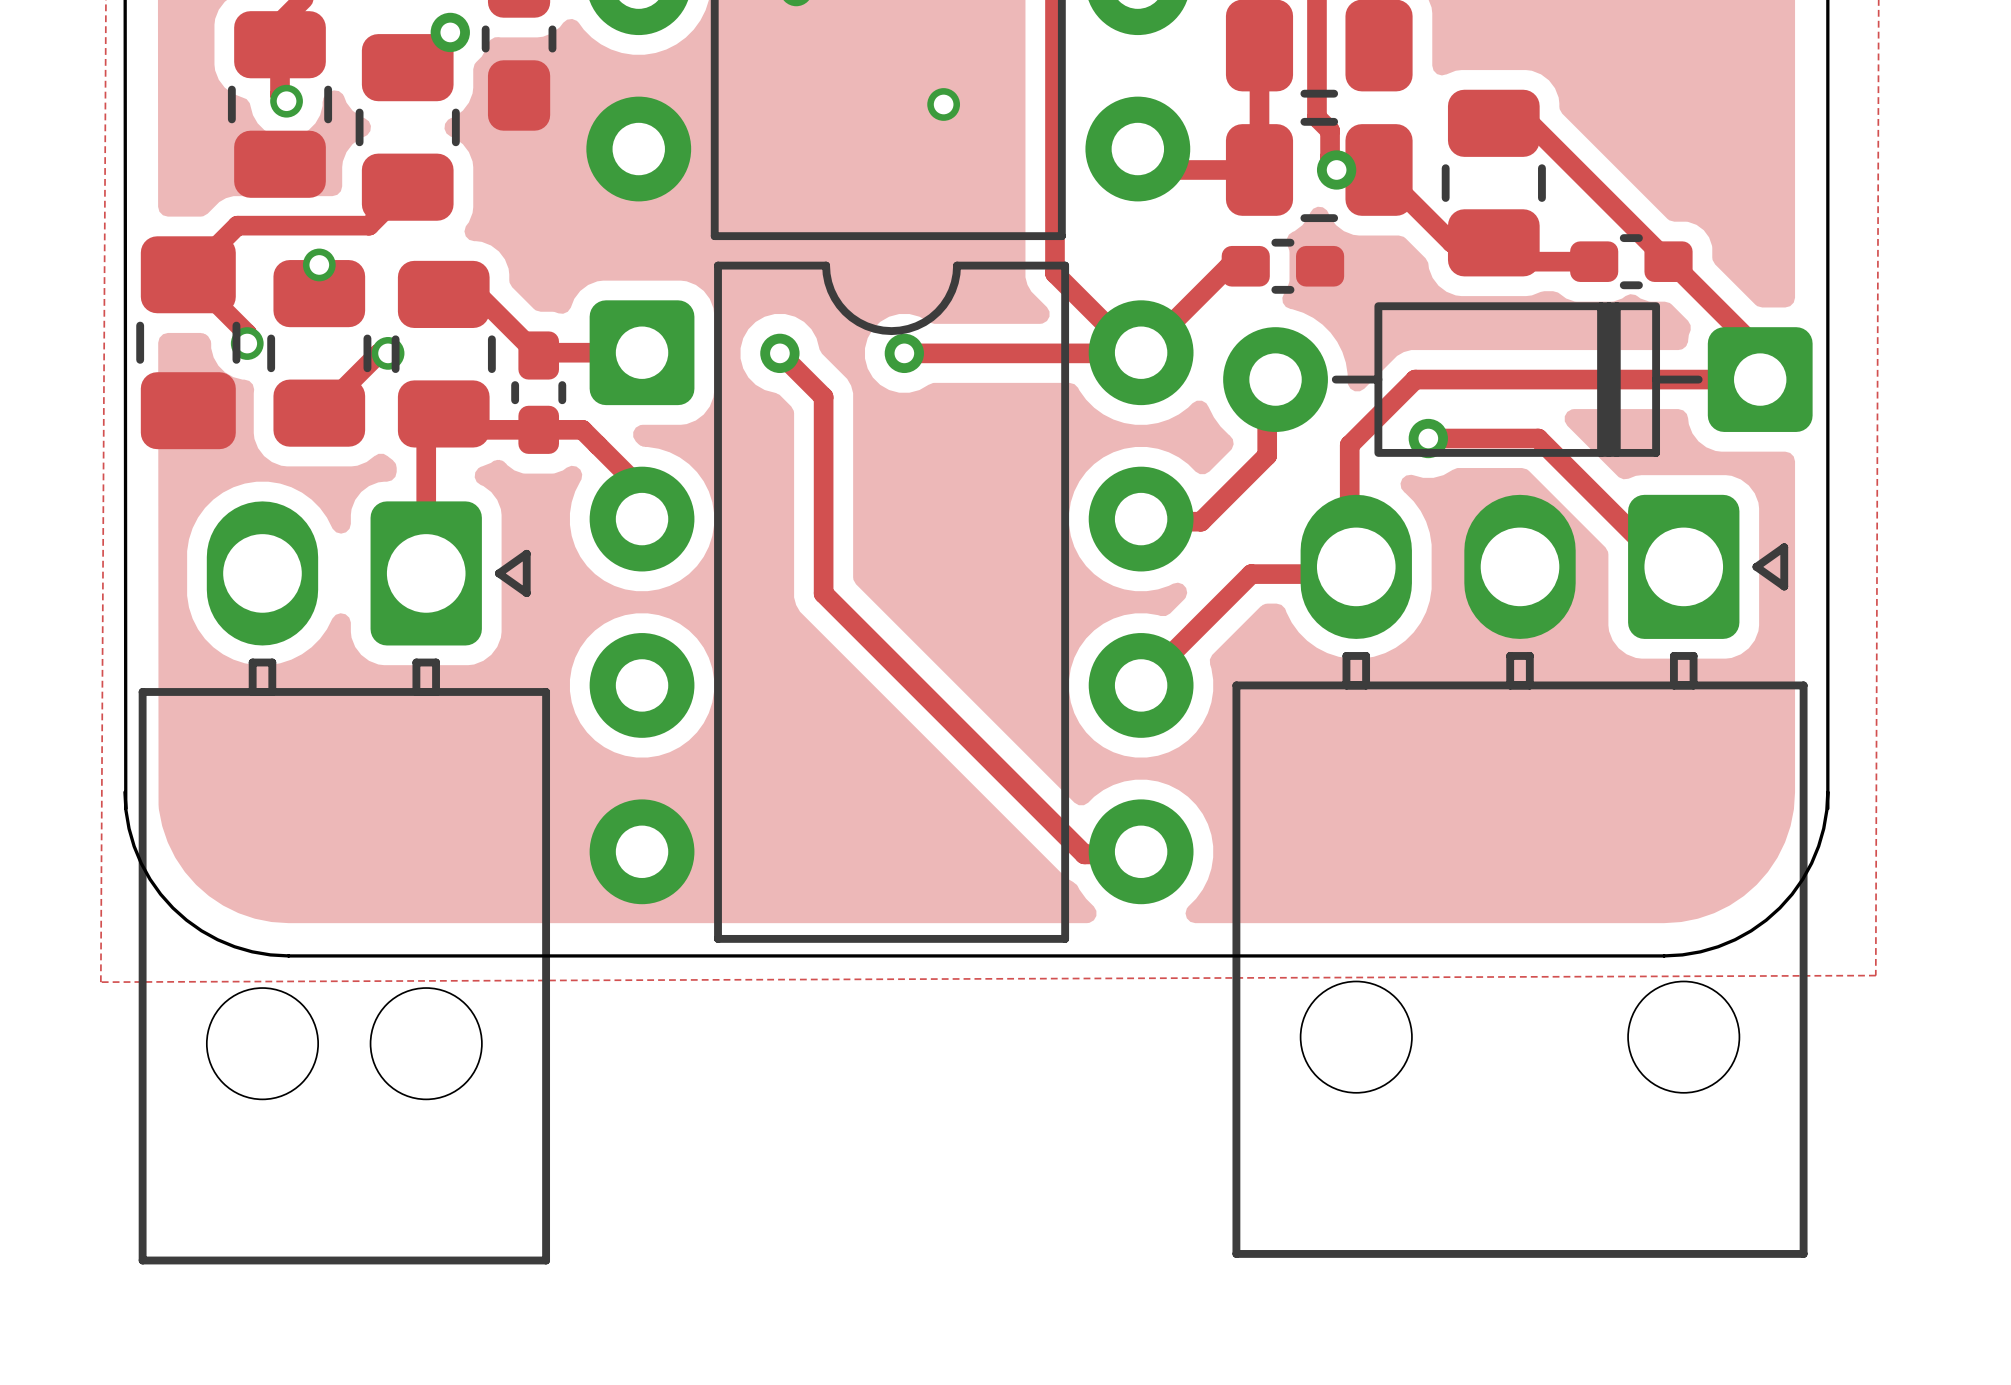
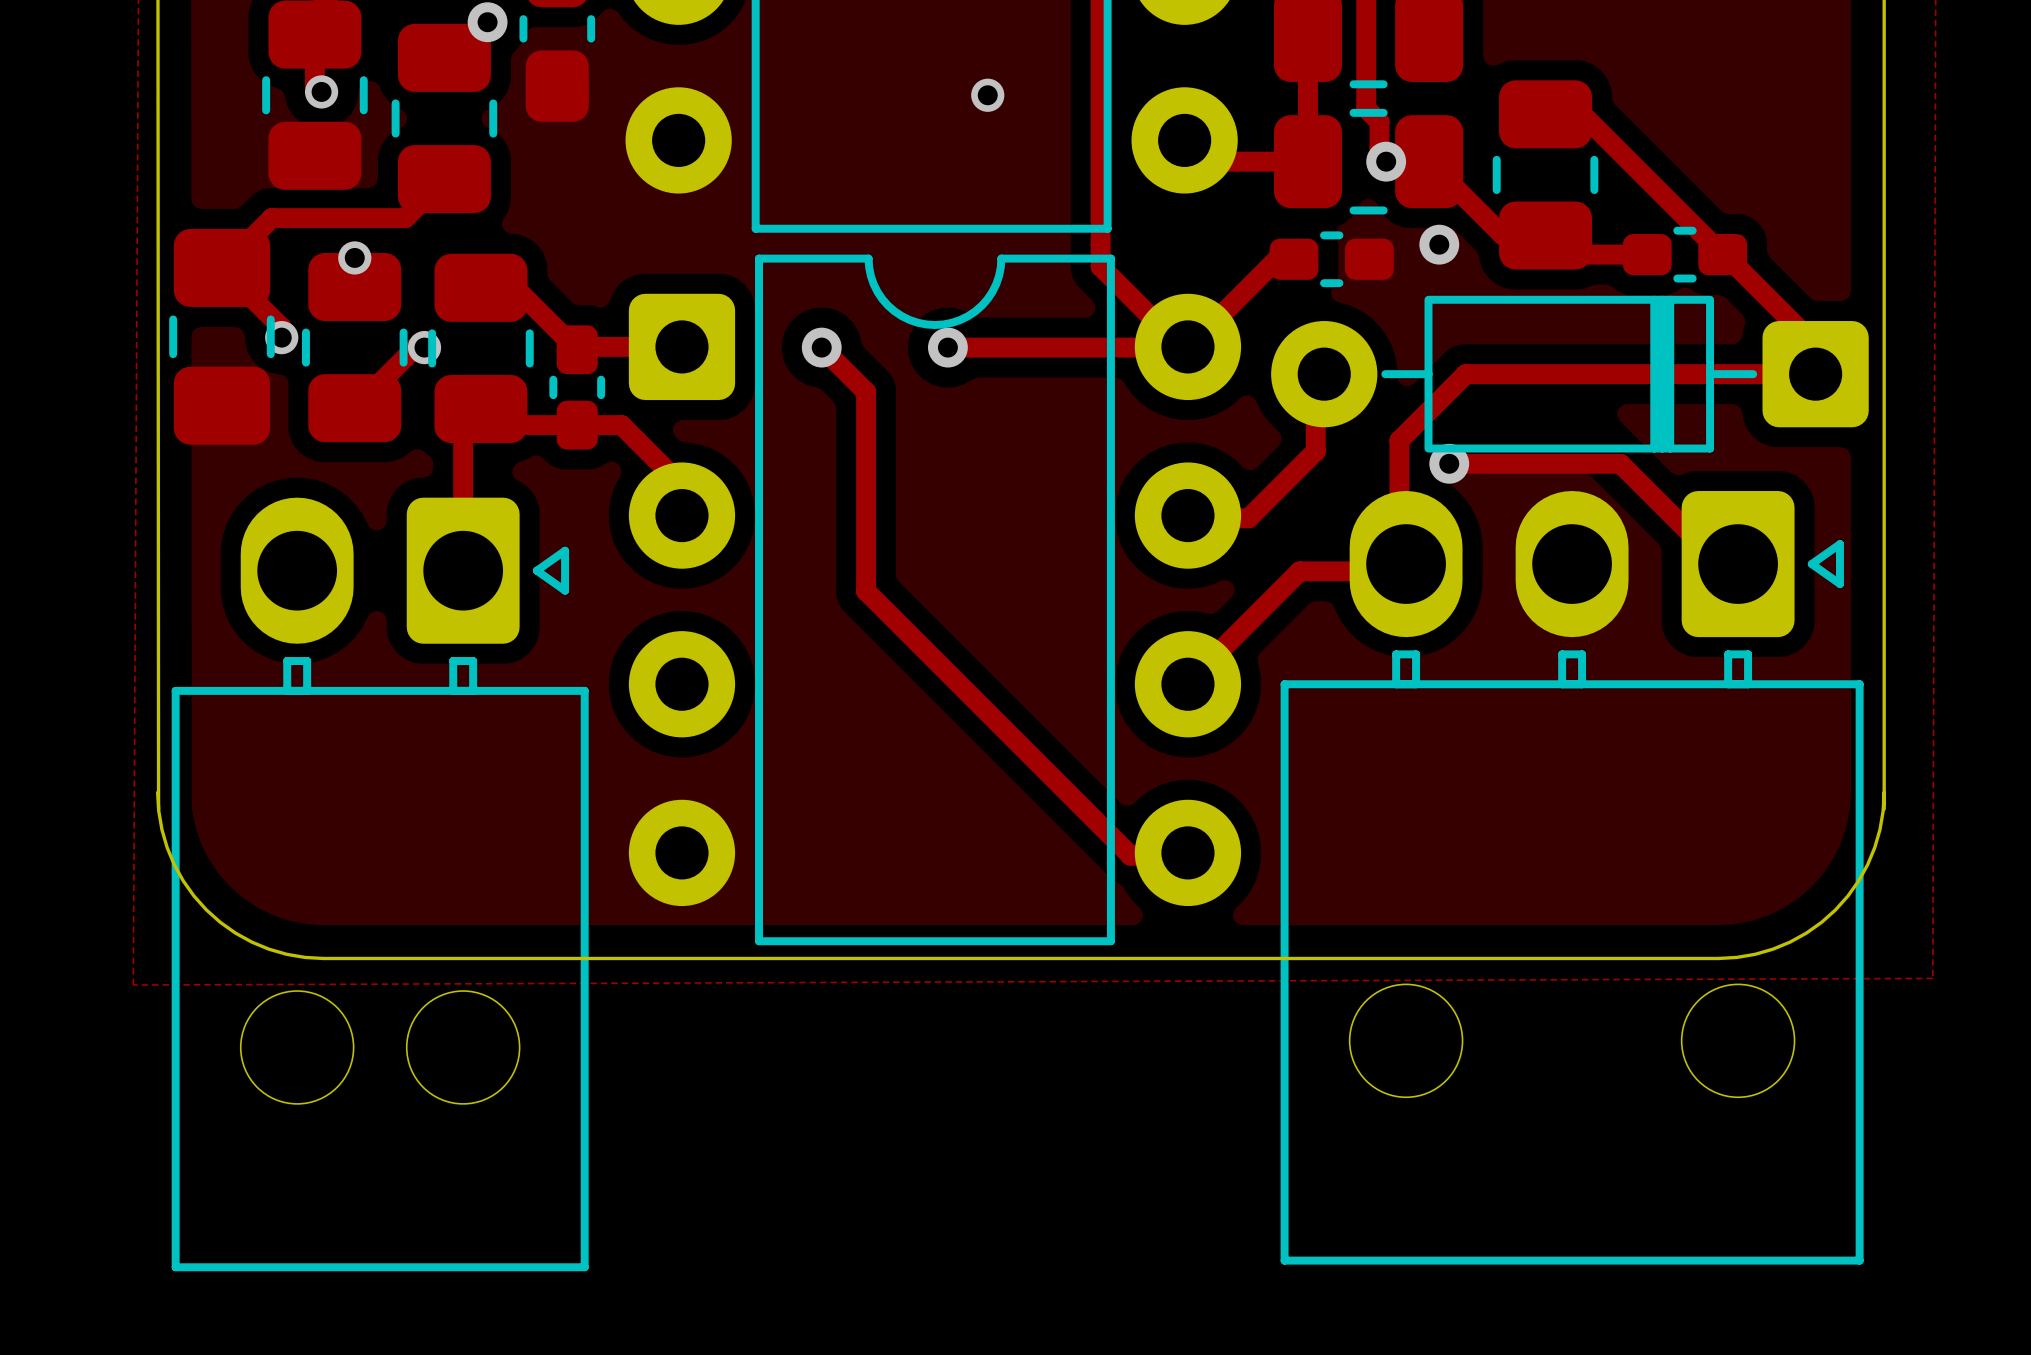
via: none -> (1439, 244)
track: (1428, 438) (1538, 438) (1567, 467) -> (1449, 463) (1620, 463)
via position: (1428, 438) -> (1449, 463)

